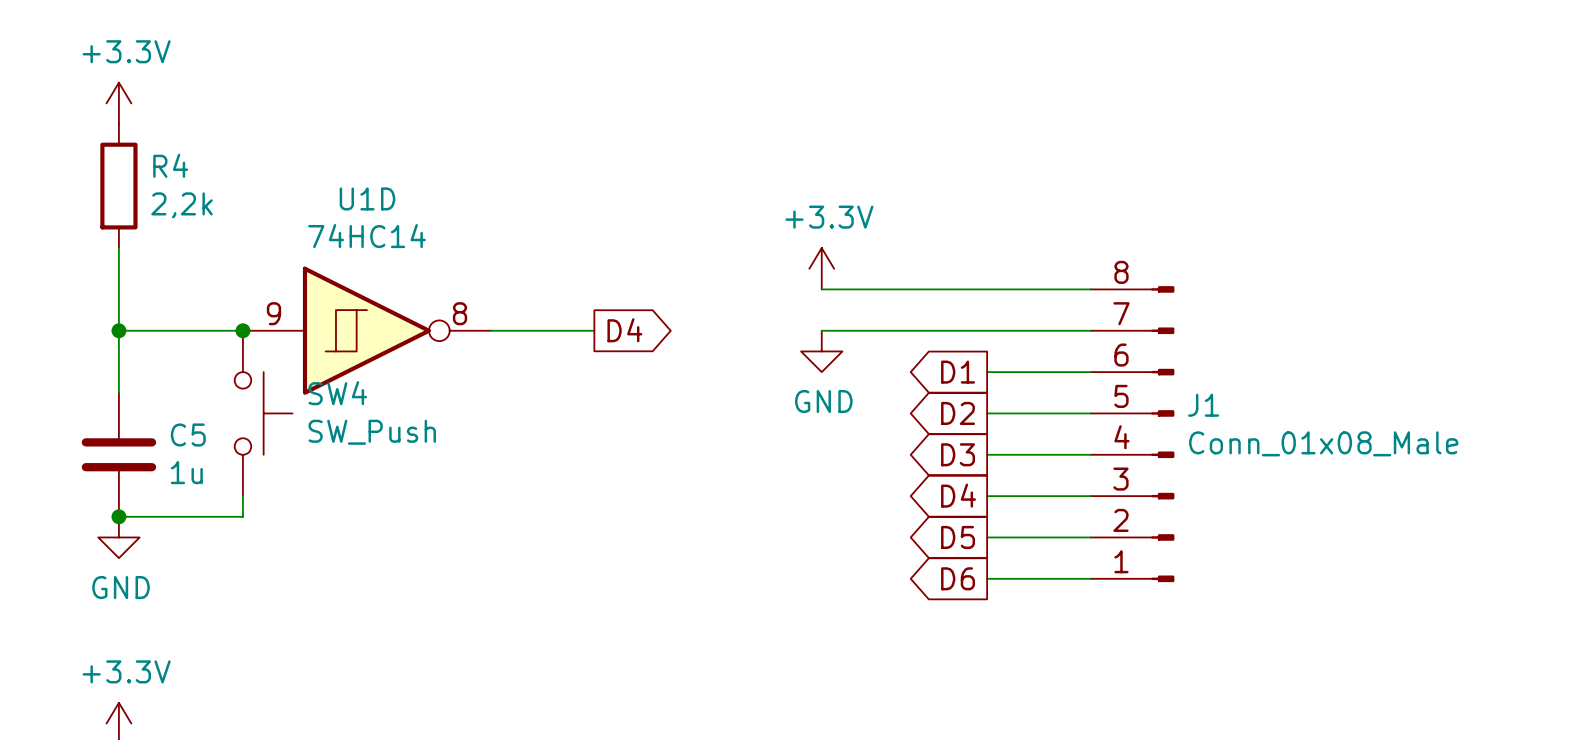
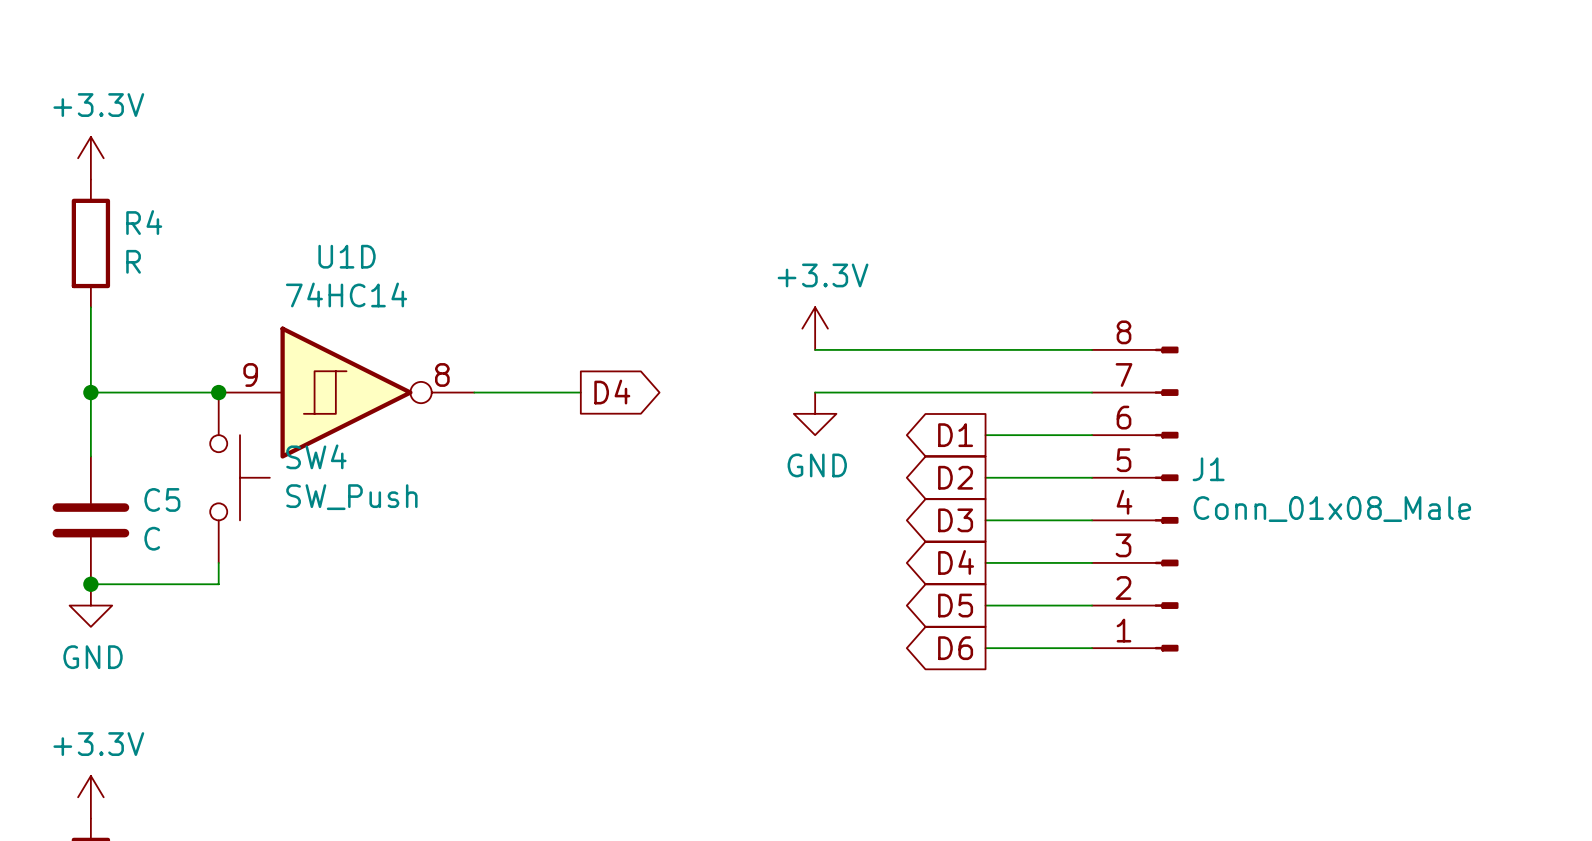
R4 value: 2,2k (181, 205) -> R (133, 261)
C5 value: 1u (186, 472) -> C (152, 538)

